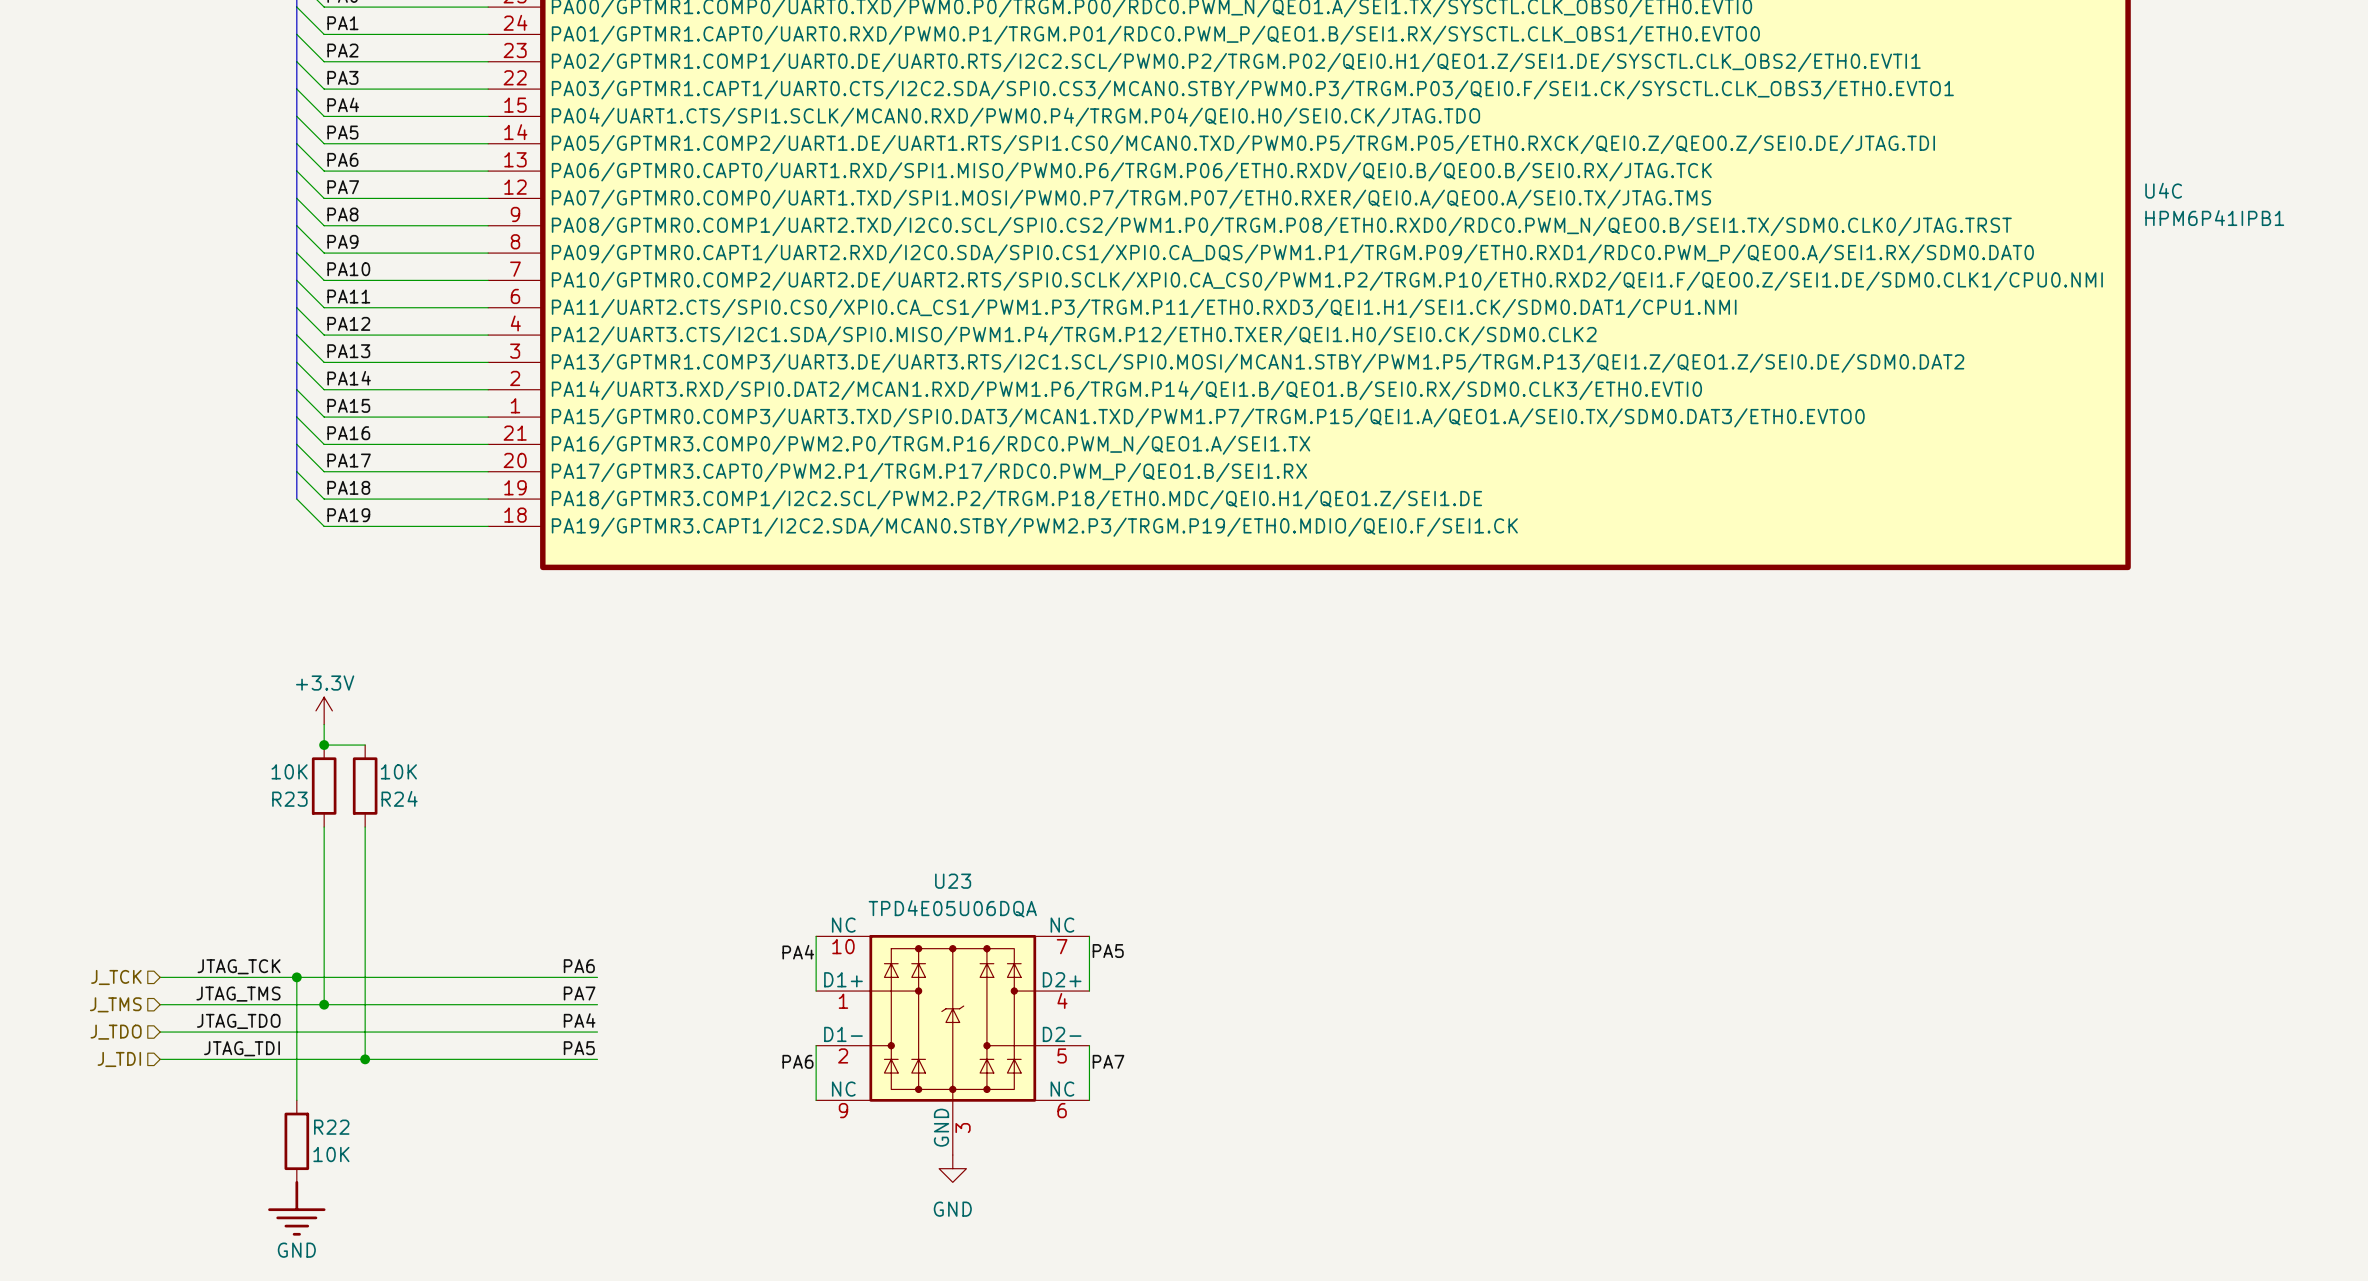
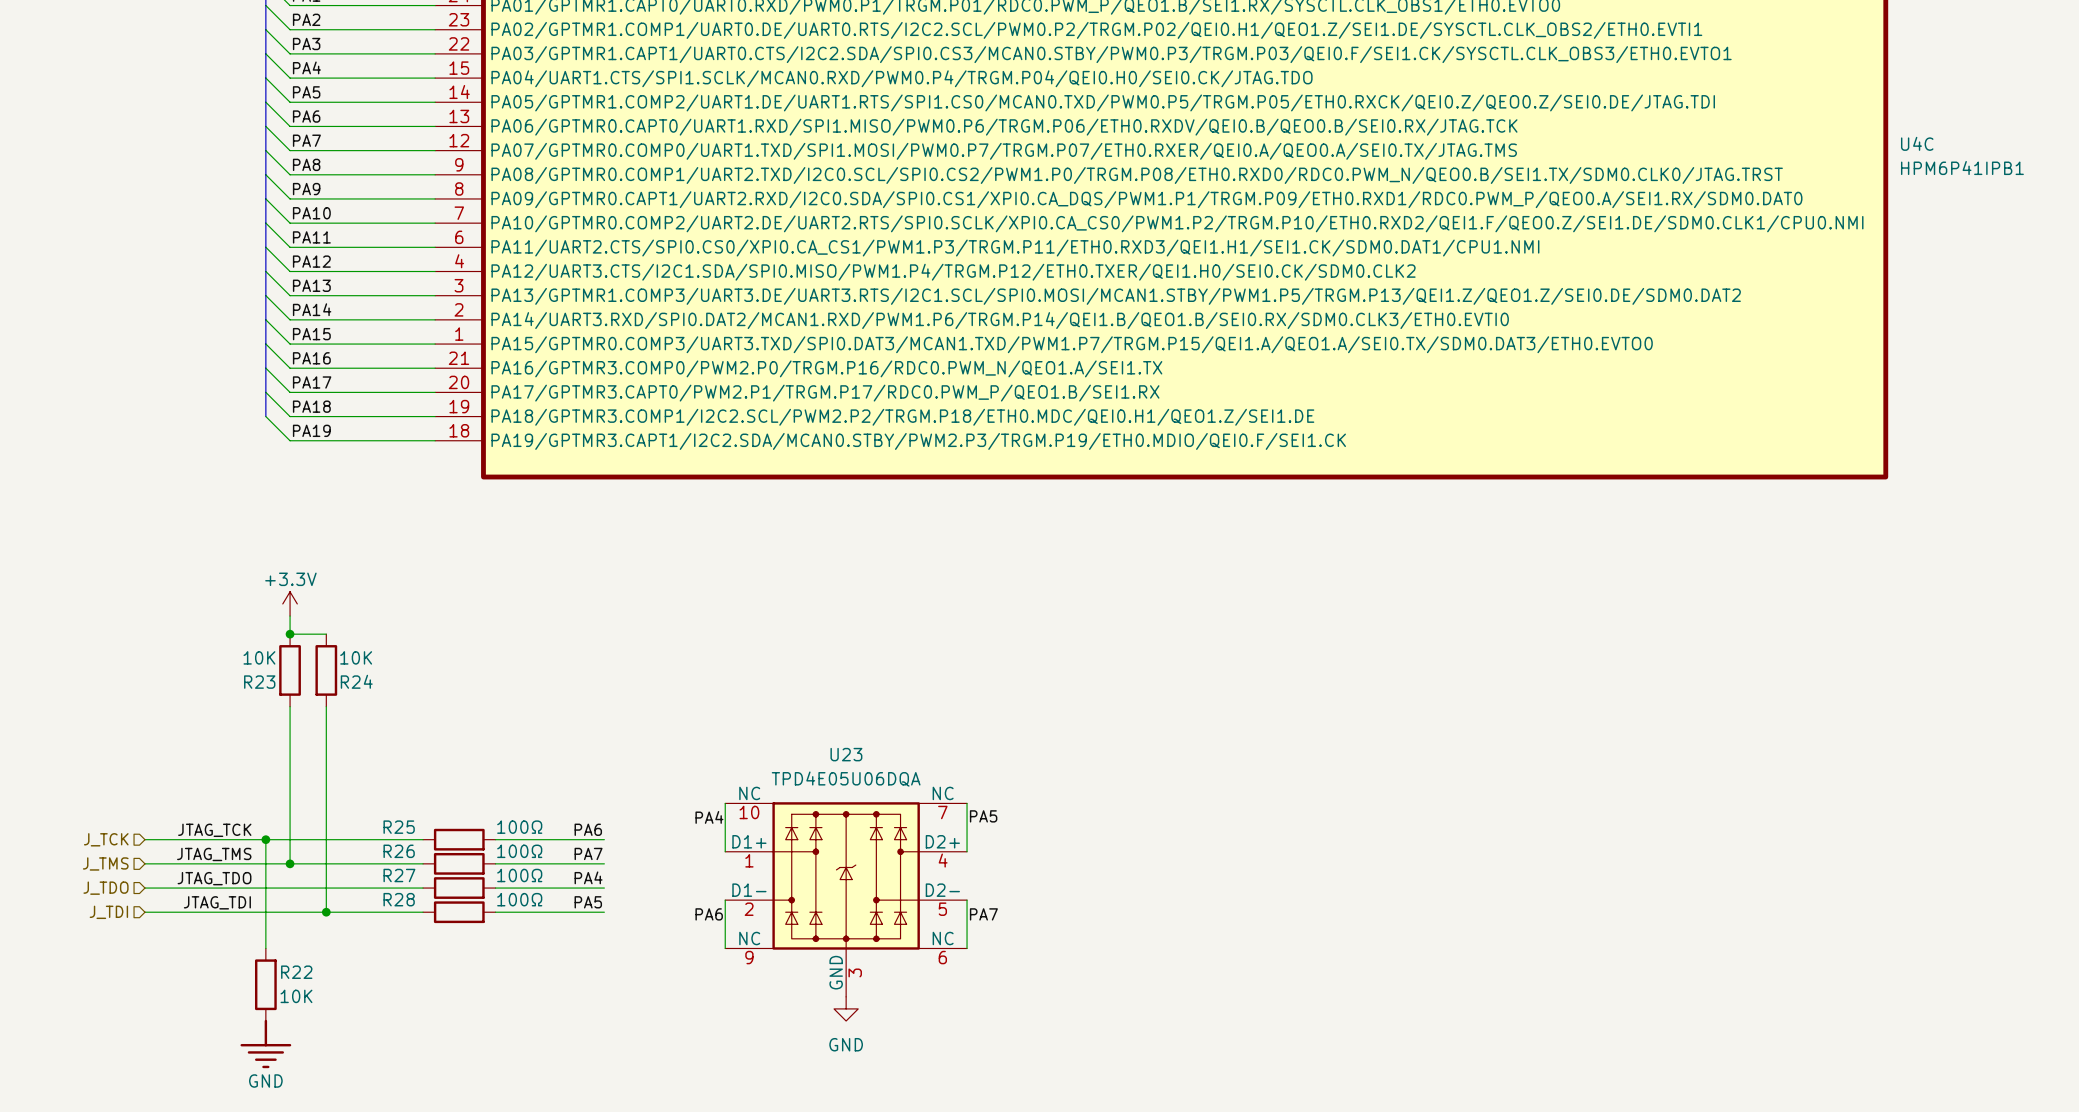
label position: PA6 (579, 966) -> PA6 (588, 829)
wire: (474, 977) (556, 977) -> (531, 839) (604, 839)
R25: none -> 100Ω (459, 839)
label position: PA7 (579, 993) -> PA7 (588, 853)
wire: (474, 1004) (556, 1004) -> (531, 863) (604, 863)
R26: none -> 100Ω (459, 863)
label position: PA4 (579, 1020) -> PA4 (588, 877)
wire: (474, 1032) (556, 1032) -> (531, 888) (604, 888)
R27: none -> 100Ω (459, 888)
label position: PA5 (579, 1048) -> PA5 (588, 902)
wire: (474, 1059) (556, 1059) -> (531, 912) (604, 912)
R28: none -> 100Ω (459, 912)

